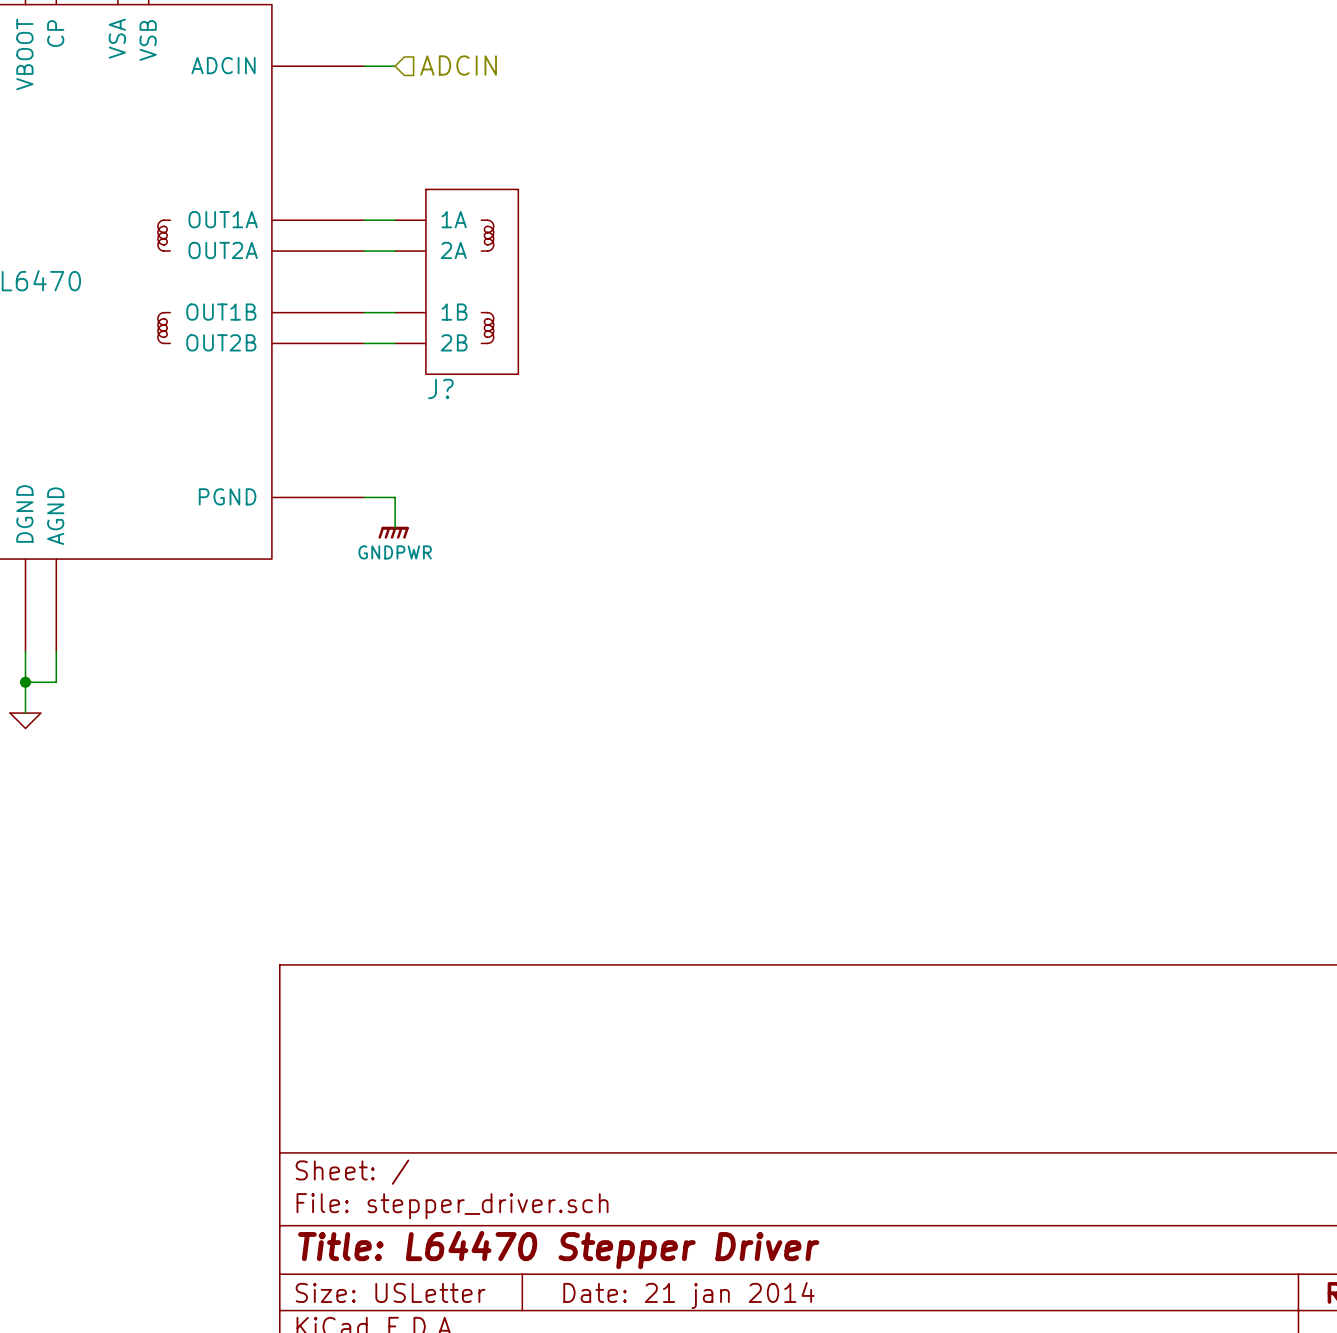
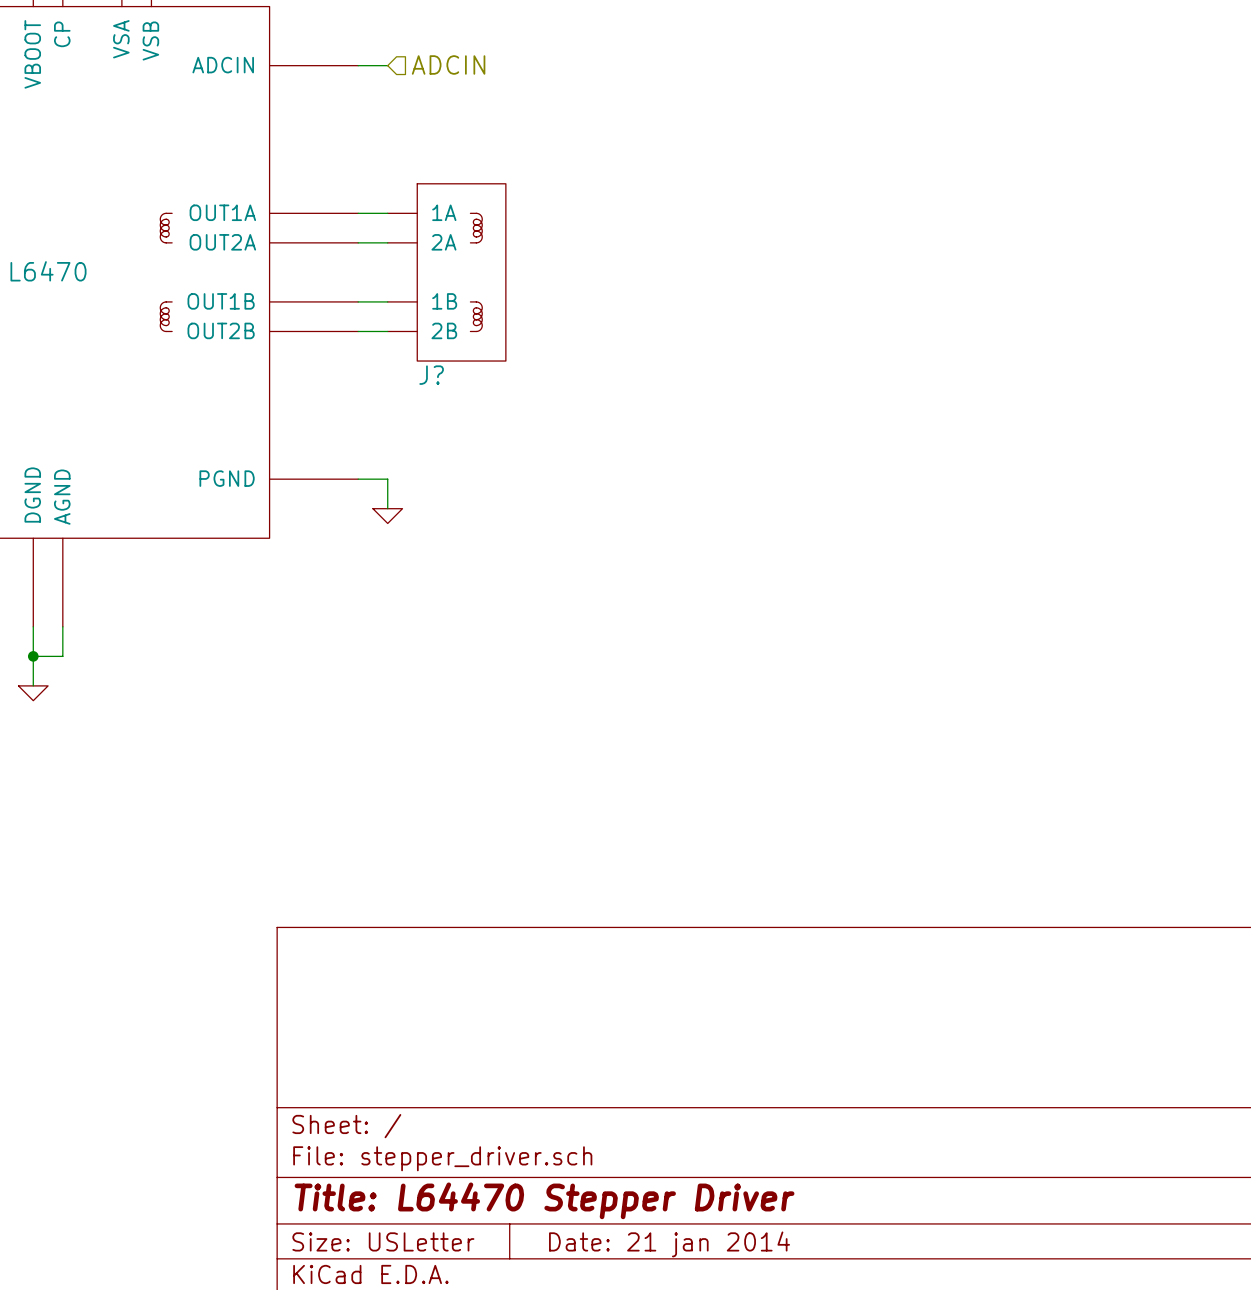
power symbol shape: [378, 526, 409, 539] -> [372, 508, 403, 524]
power symbol text: GNDPWR (395, 552) -> none

